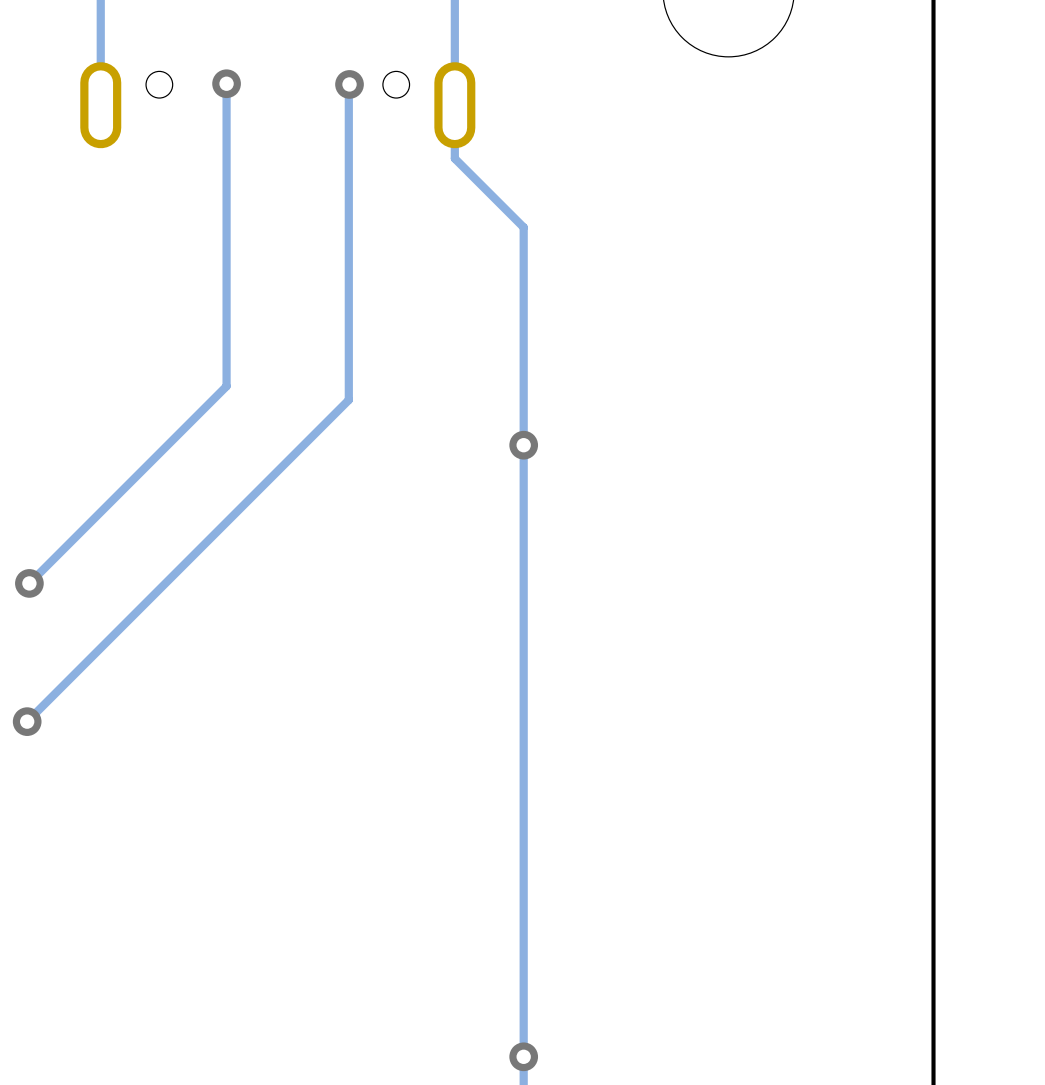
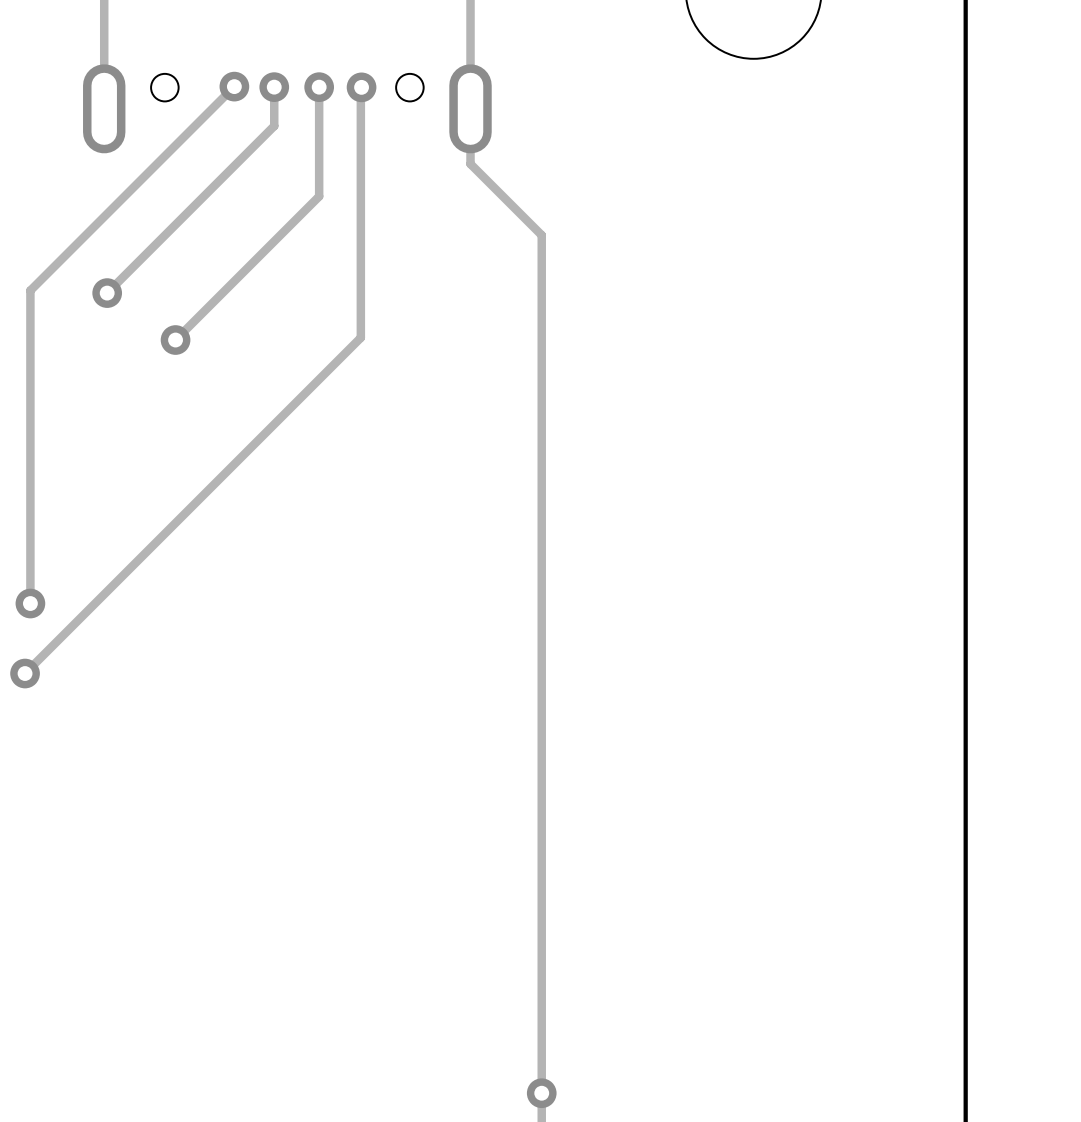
track: (226, 83) (226, 386) (29, 583) -> (234, 86) (30, 290) (30, 603)
track: none -> (274, 87) (274, 126) (107, 293)
via: none -> (274, 87)
track: none -> (319, 87) (319, 196) (175, 340)
via: none -> (319, 87)
via: none -> (107, 293)
track: (348, 326) (348, 399) (27, 721) -> (360, 337) (25, 673)
via: none -> (175, 340)
via: (523, 445) -> none
via position: (27, 721) -> (25, 673)

